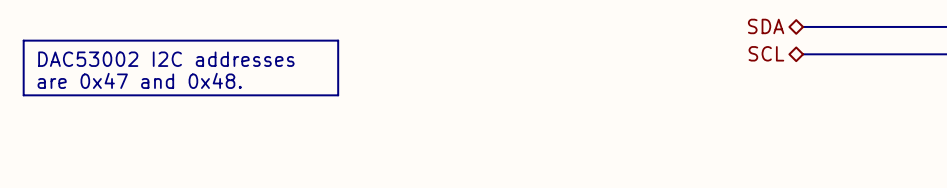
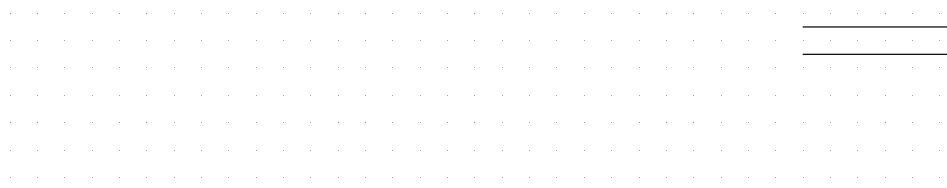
hierarchical label: SDA (766, 26) -> none
line: (23, 40) (338, 40) (338, 95) (23, 95) (23, 40) -> none
hierarchical label: SCL (766, 53) -> none
text: DAC53002 I2C addresses (166, 59) -> none
text: are 0x47 and 0x48. (139, 80) -> none

